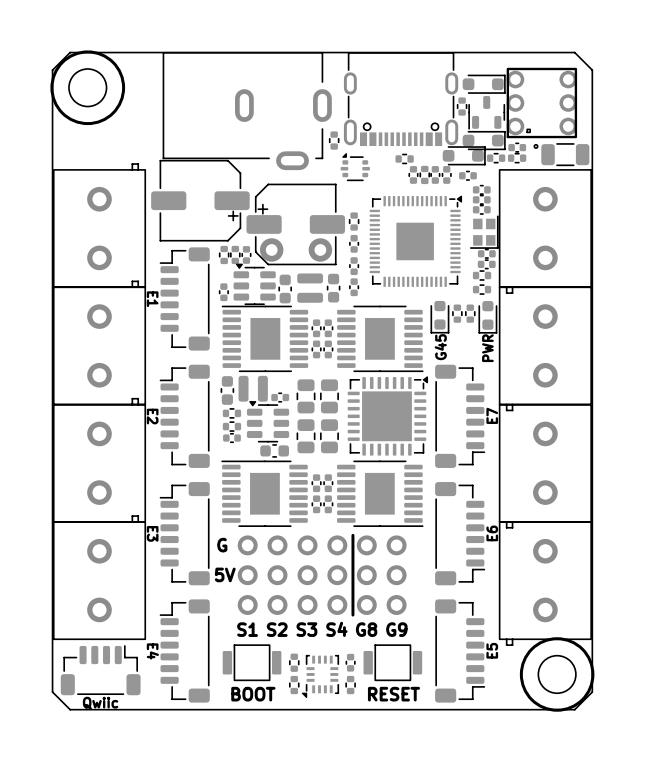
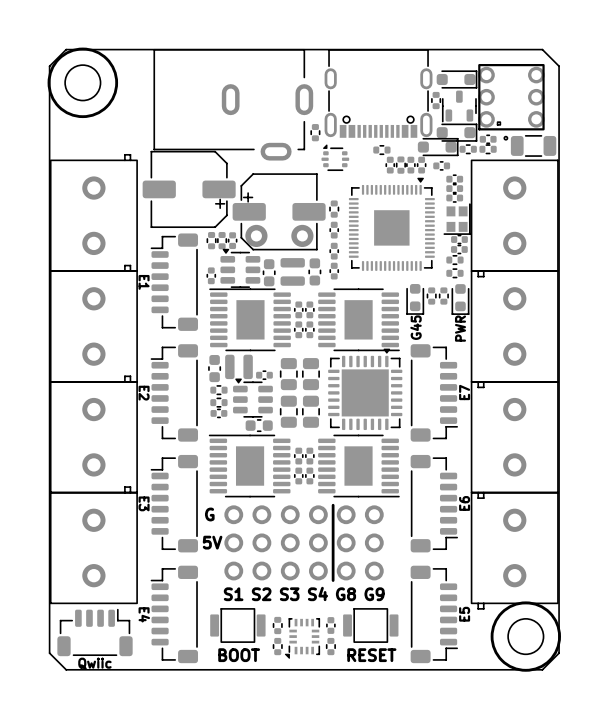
part footprint: [369, 195, 463, 287] -> [348, 177, 435, 271]
part footprint: [347, 376, 429, 456] -> [328, 348, 403, 431]

